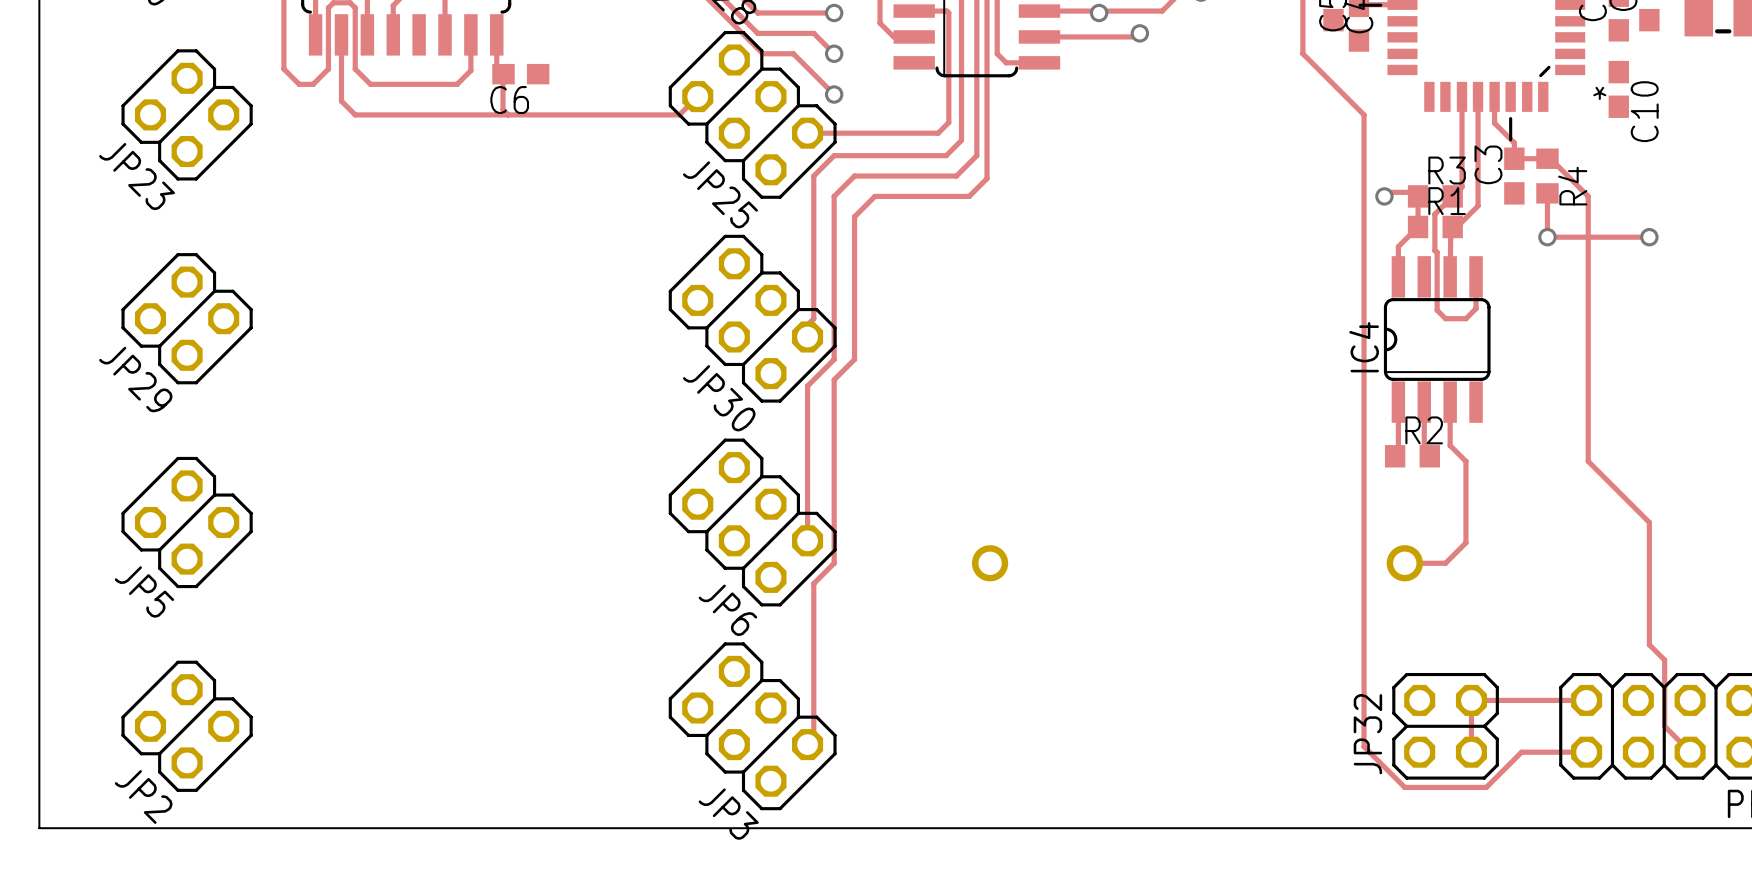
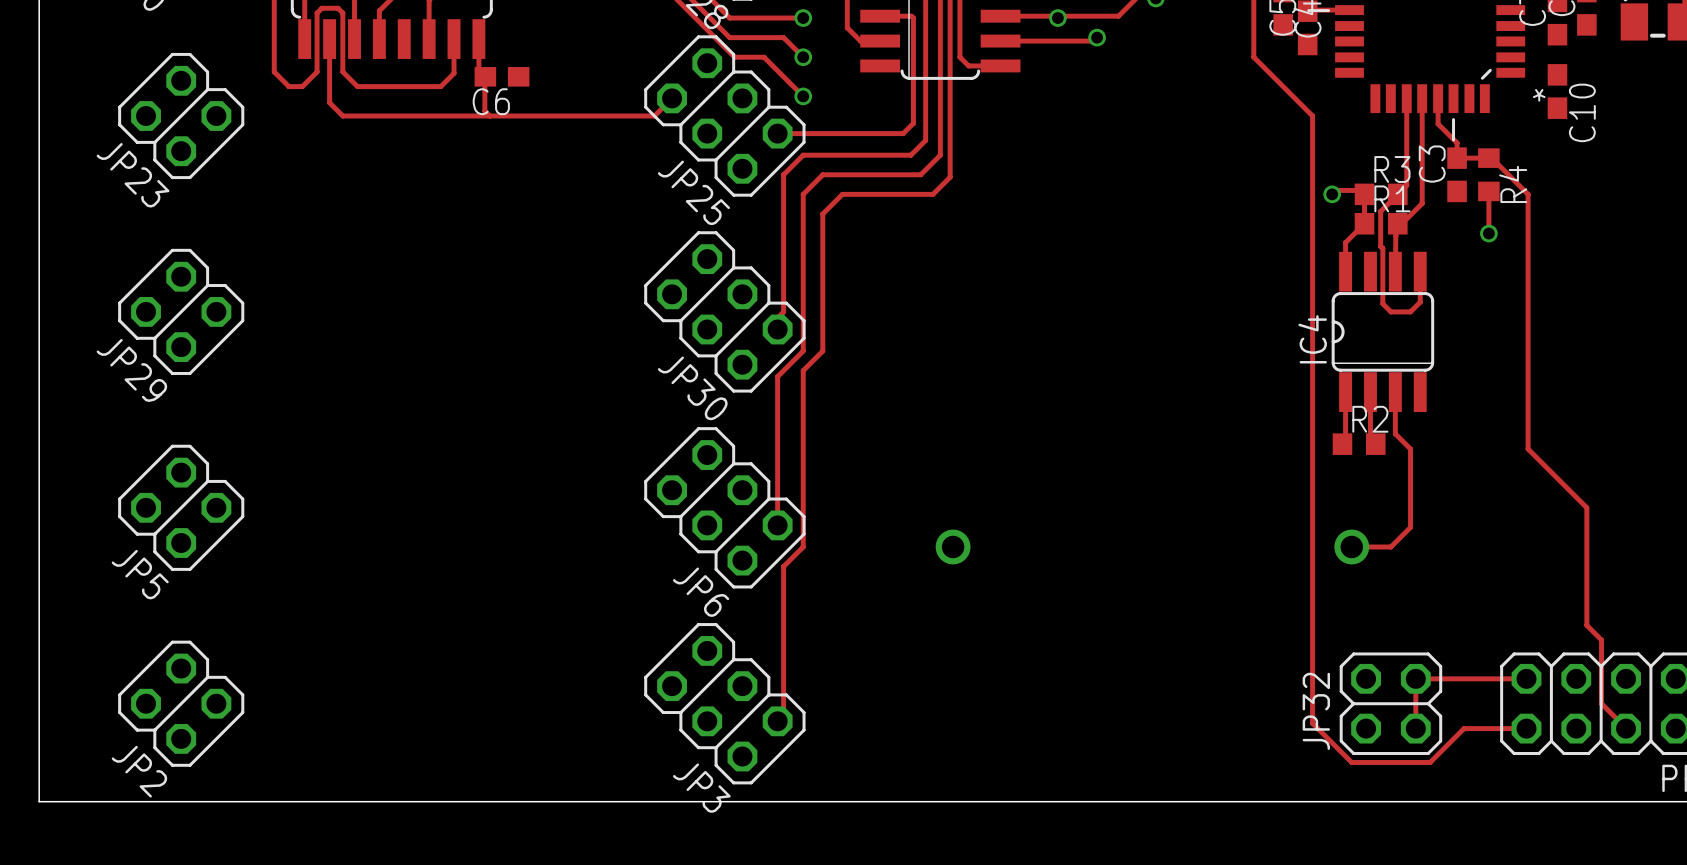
track: (1547, 237) (1649, 237) -> none
via: (1649, 237) -> none

